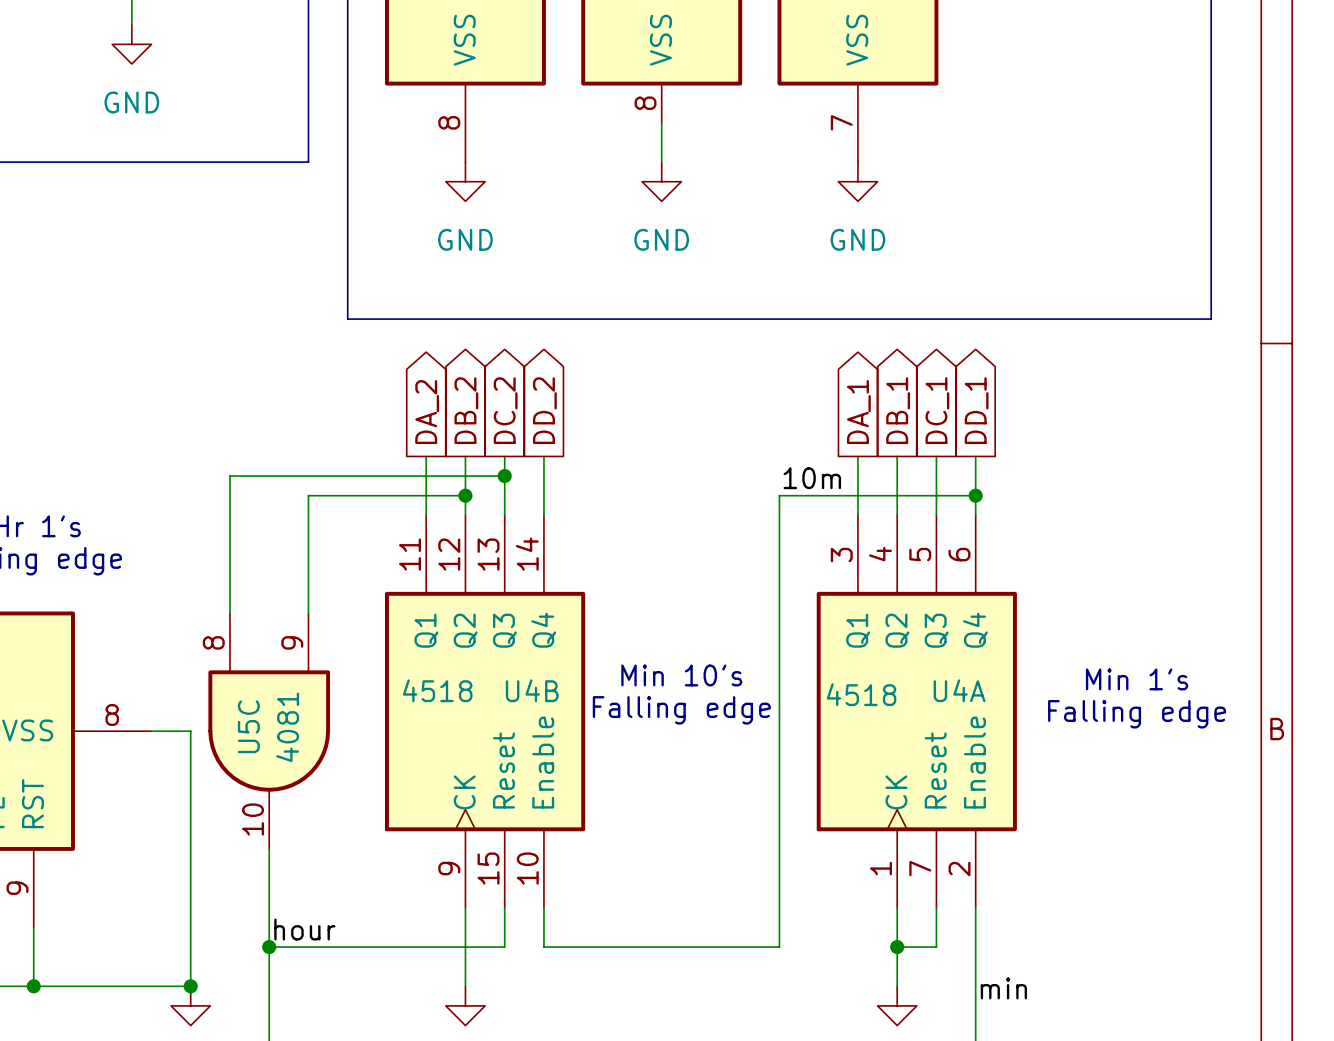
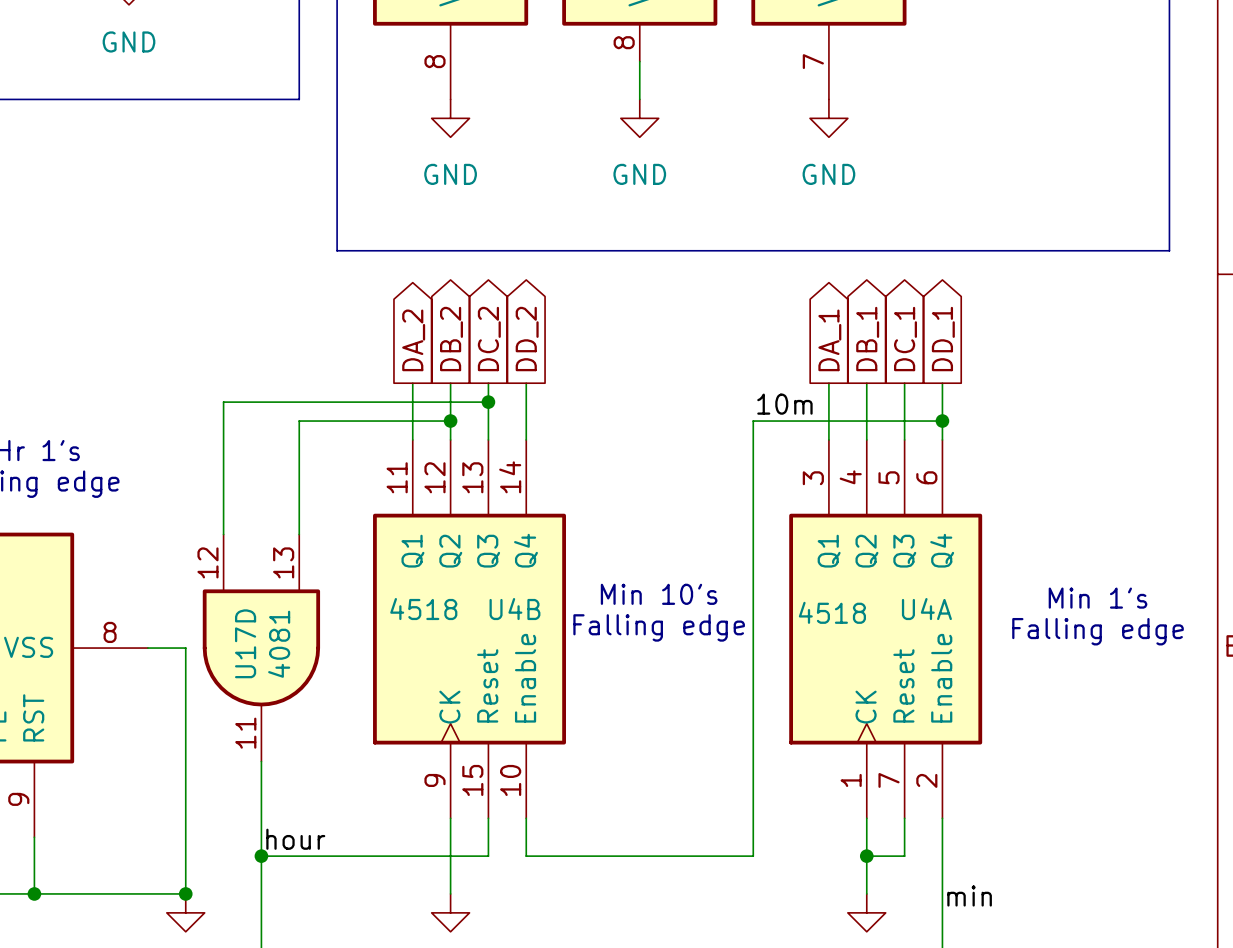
U5C pin number: 8 (213, 642) -> 12 (207, 562)
U5C pin number: 9 (292, 642) -> 13 (283, 562)
U5C name: U5C (248, 726) -> U17D (245, 643)
U5C pin number: 10 (253, 819) -> 11 (245, 733)

